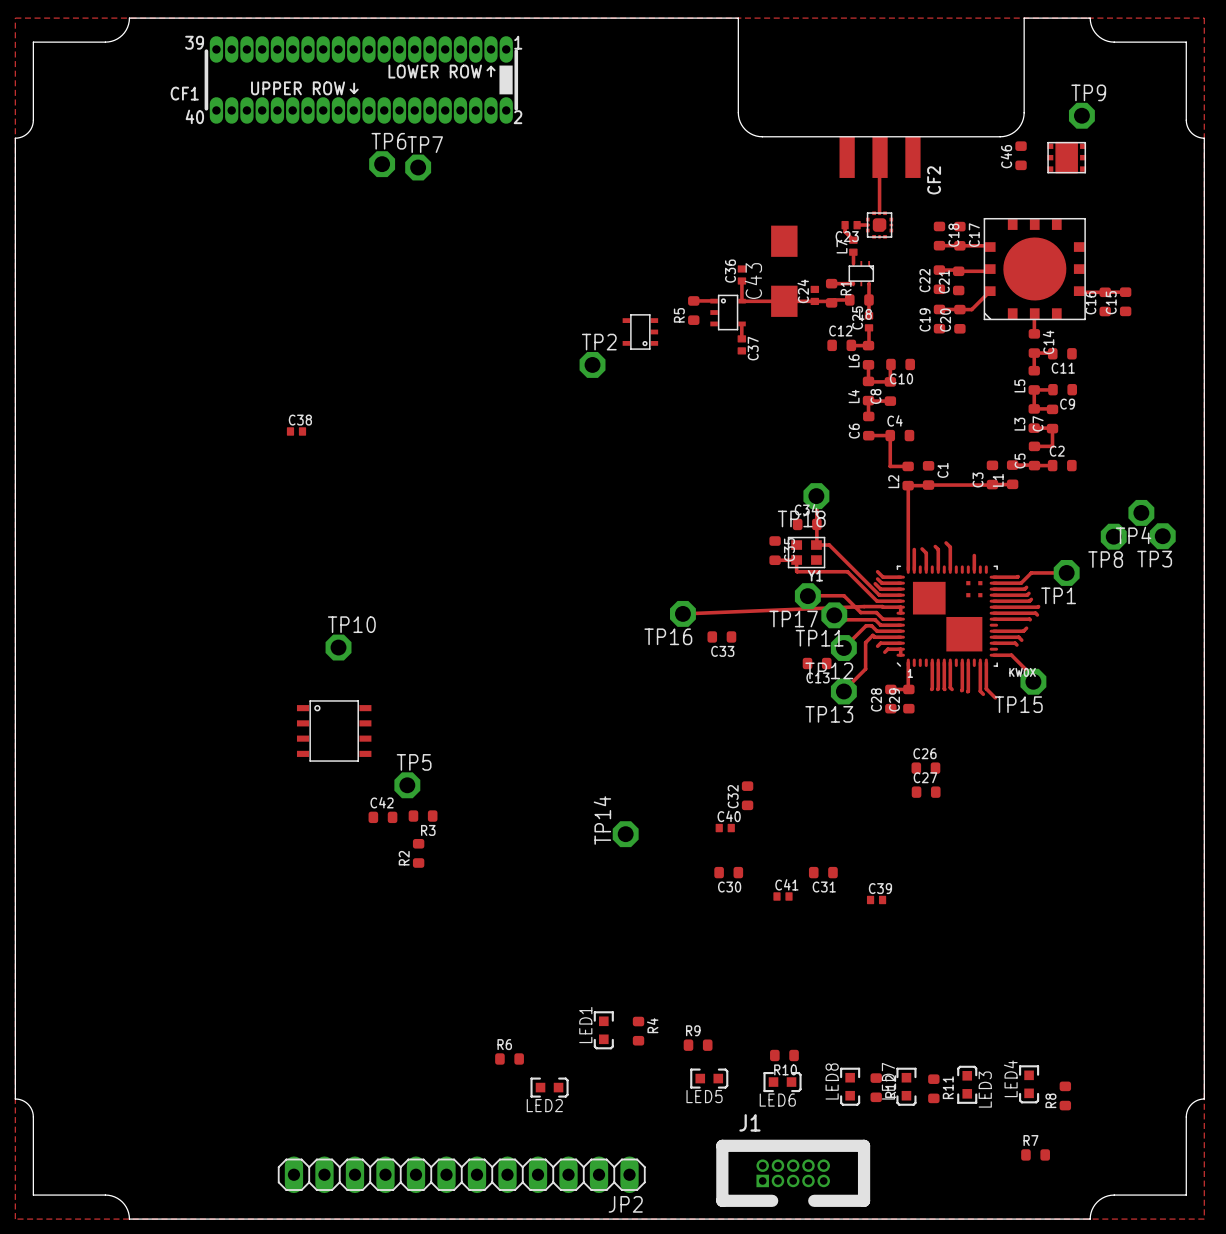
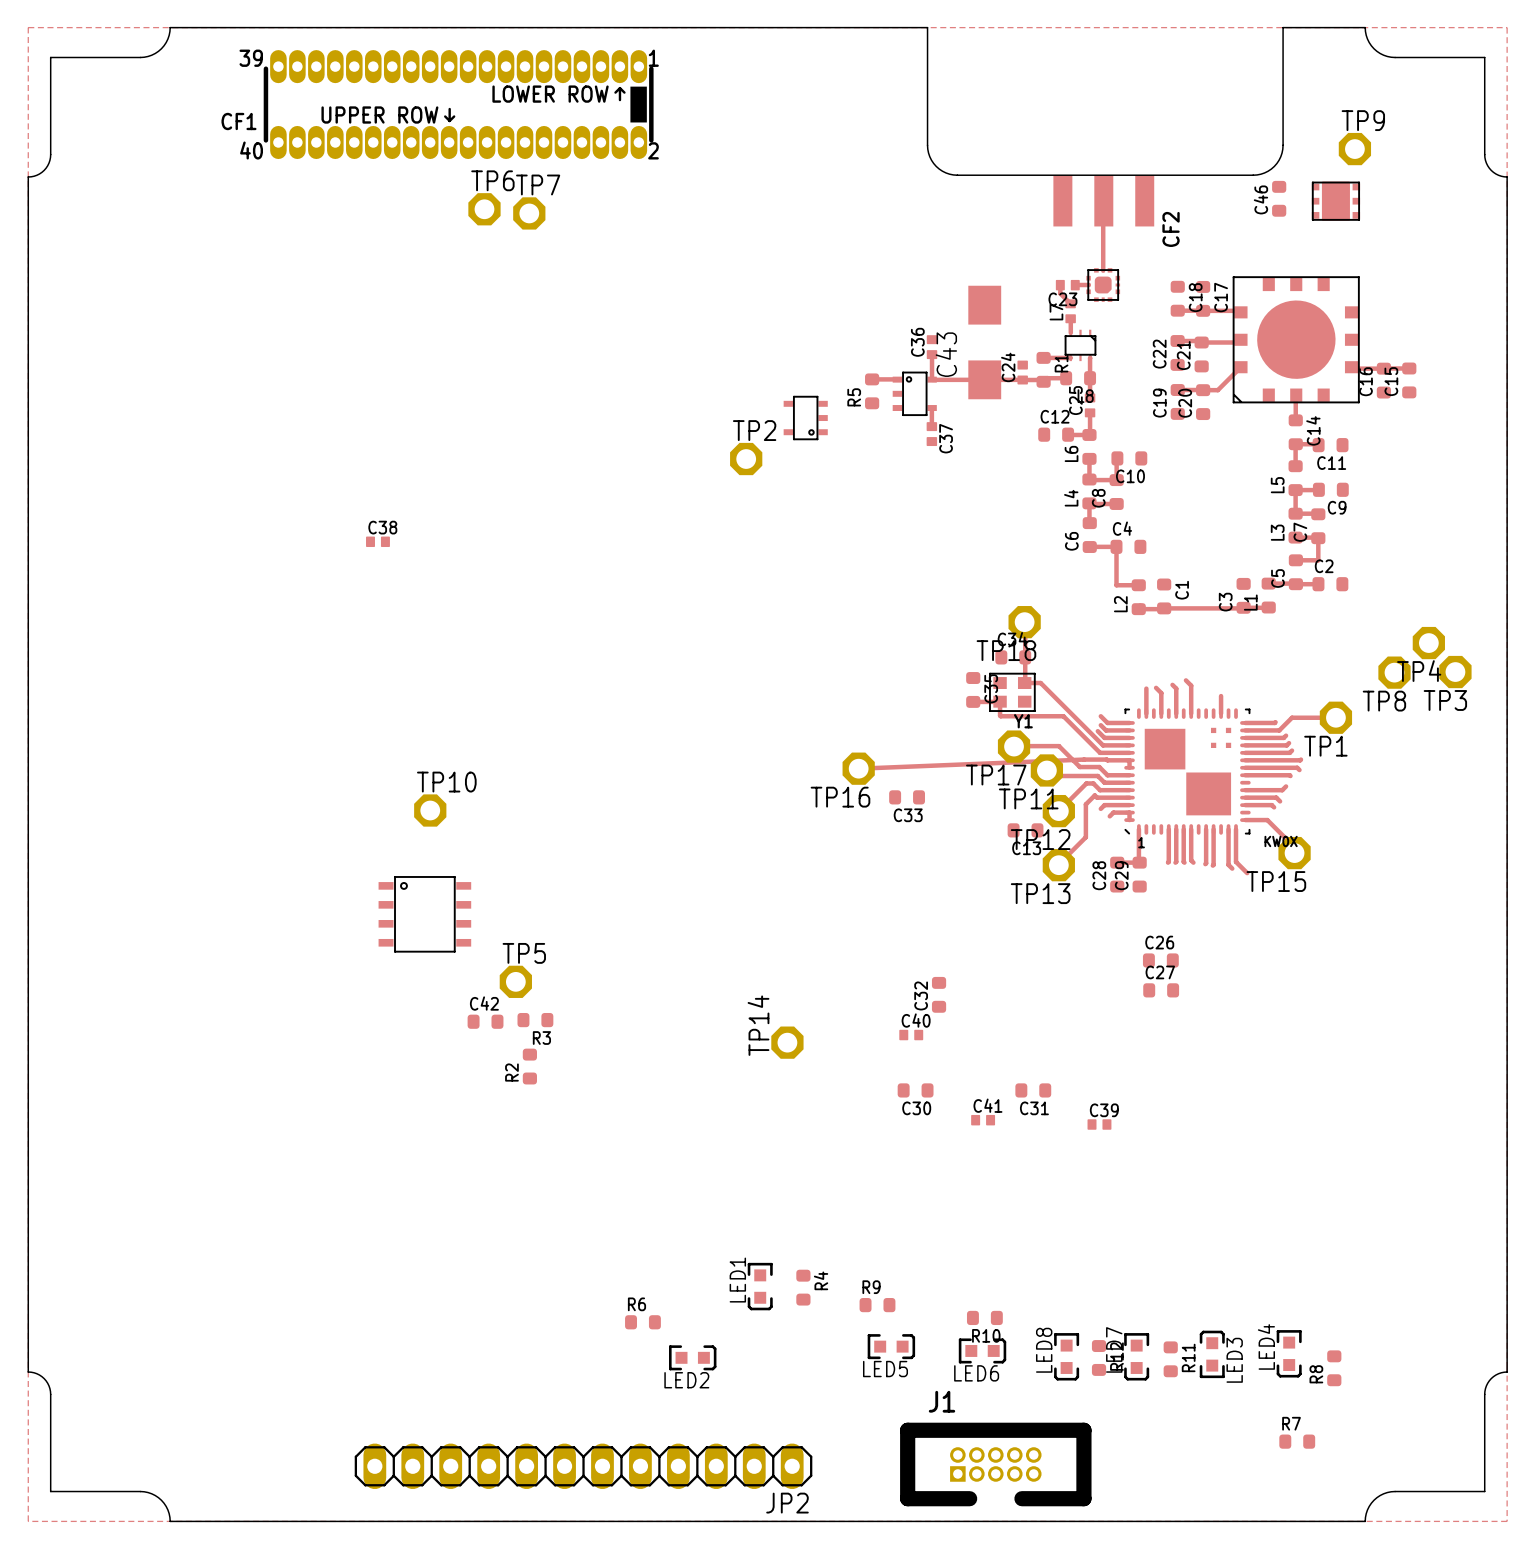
track: (908, 485) (908, 569) -> none

